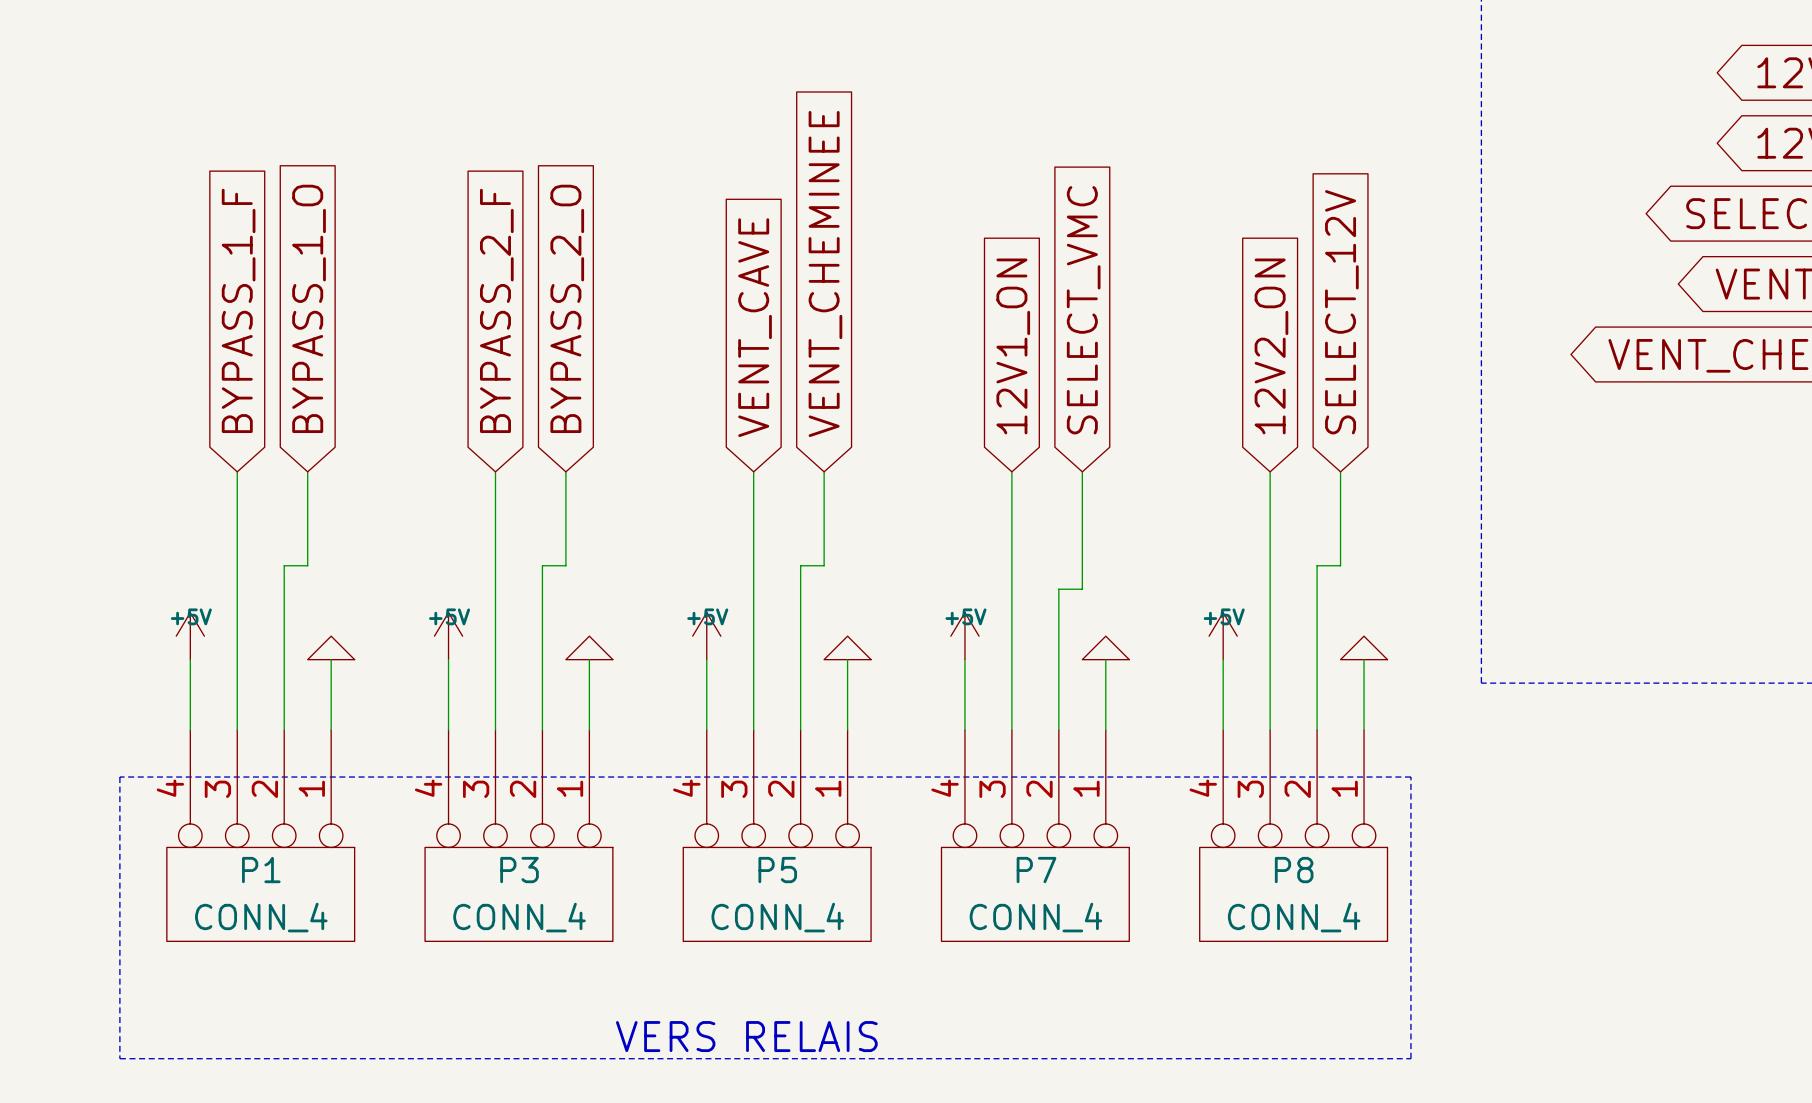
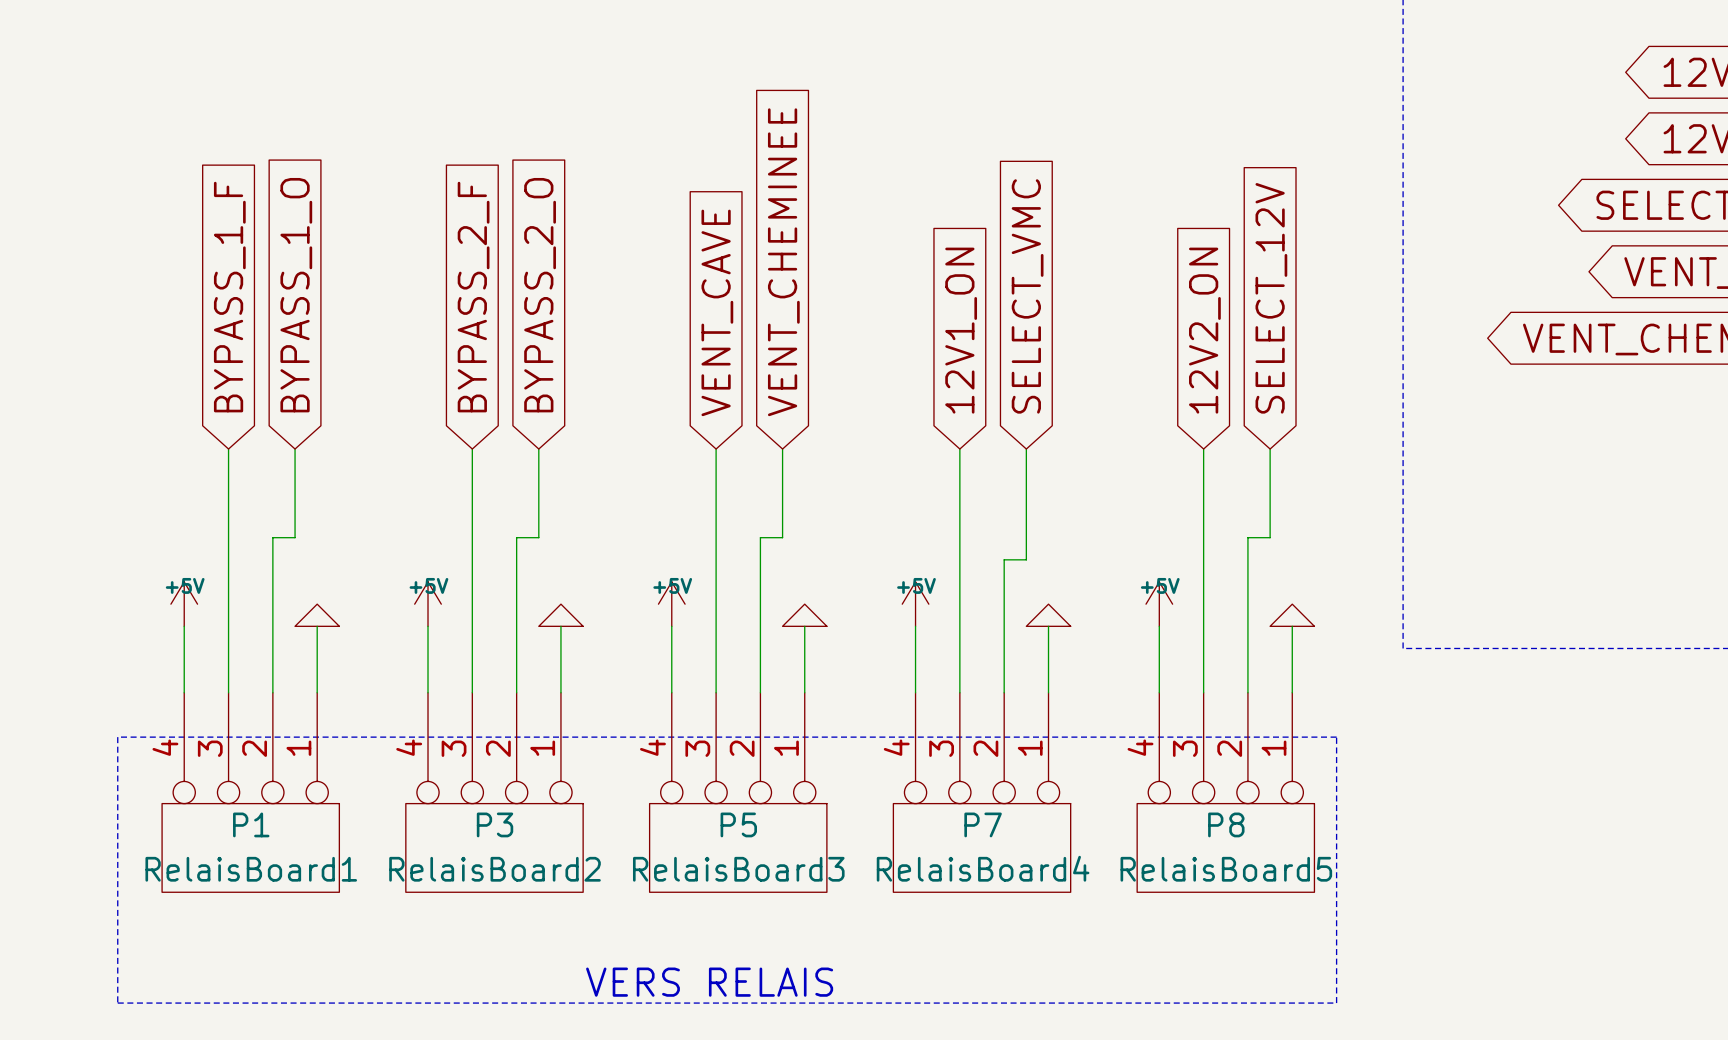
P1 value: CONN_4 (261, 917) -> RelaisBoard1 (251, 869)
P3 value: CONN_4 (519, 917) -> RelaisBoard2 (495, 869)
P5 value: CONN_4 (777, 917) -> RelaisBoard3 (738, 869)
P7 value: CONN_4 (1035, 917) -> RelaisBoard4 (983, 868)
P8 value: CONN_4 (1294, 917) -> RelaisBoard5 (1226, 869)

